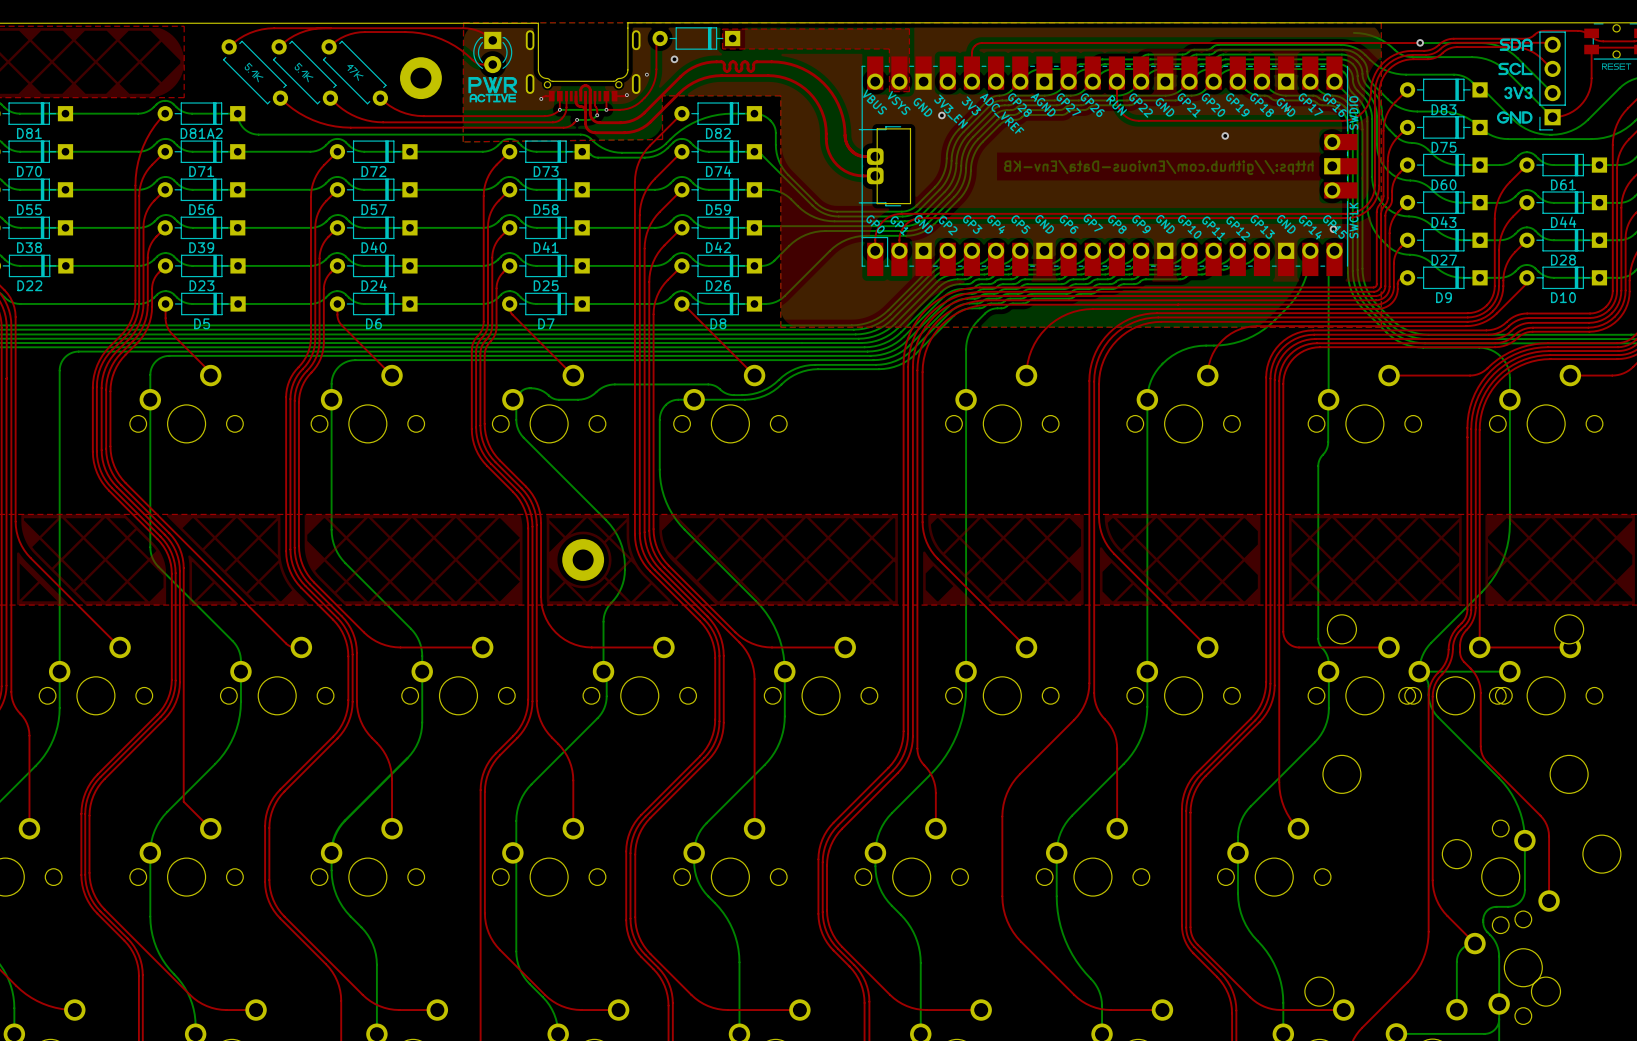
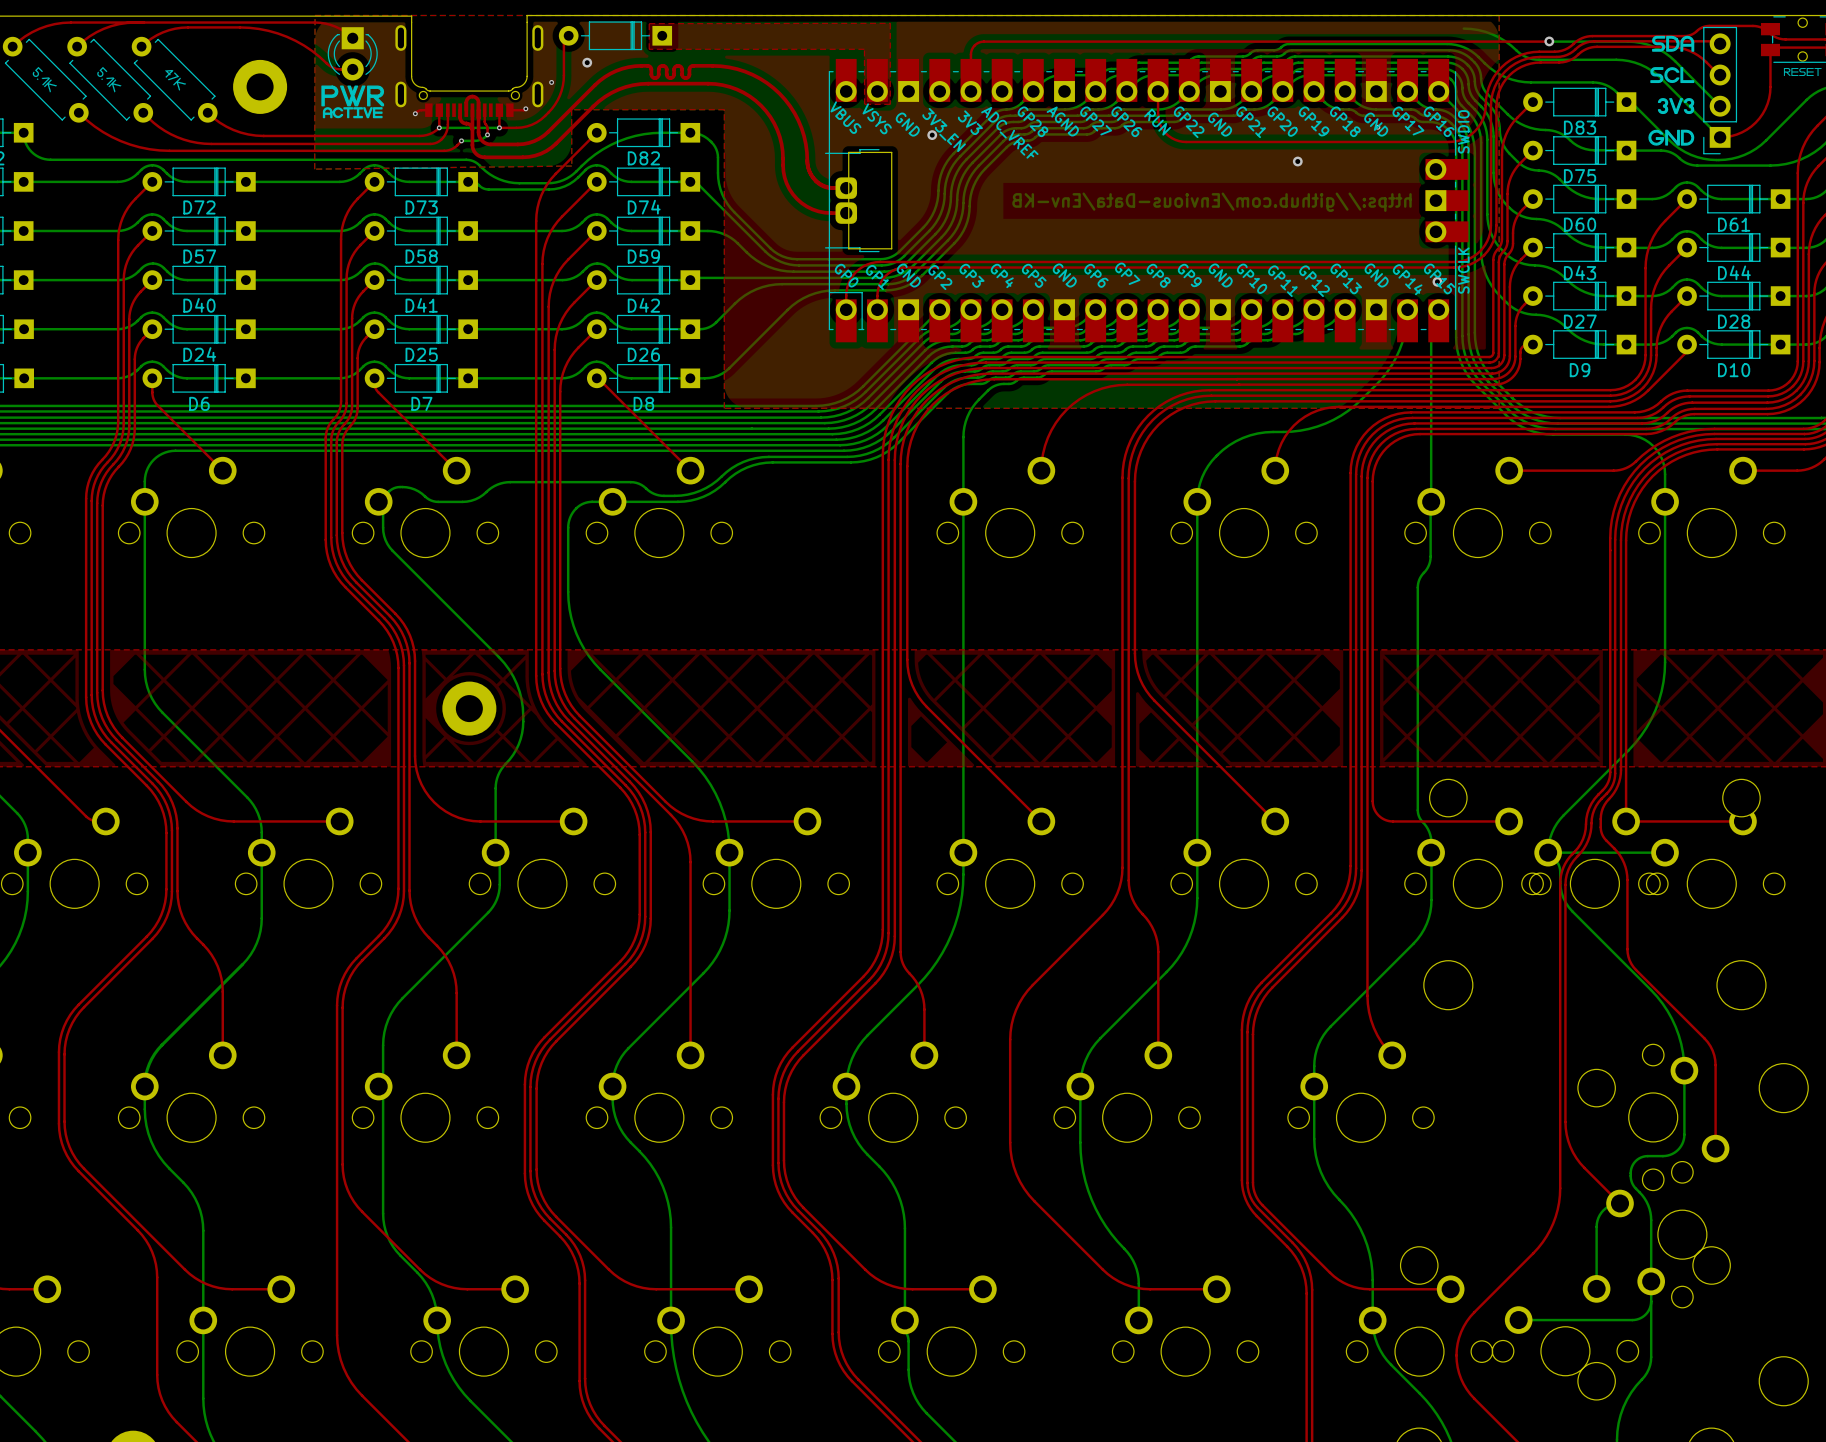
bottom track: (1417, 111) (1457, 113) (1471, 120) (1489, 134) (1500, 138) (1534, 139) -> (1545, 130) (1561, 134) (1577, 145) (1585, 149) (1626, 150)
bottom track: none -> (1626, 150) (1666, 151) (1687, 163) (1697, 165)

